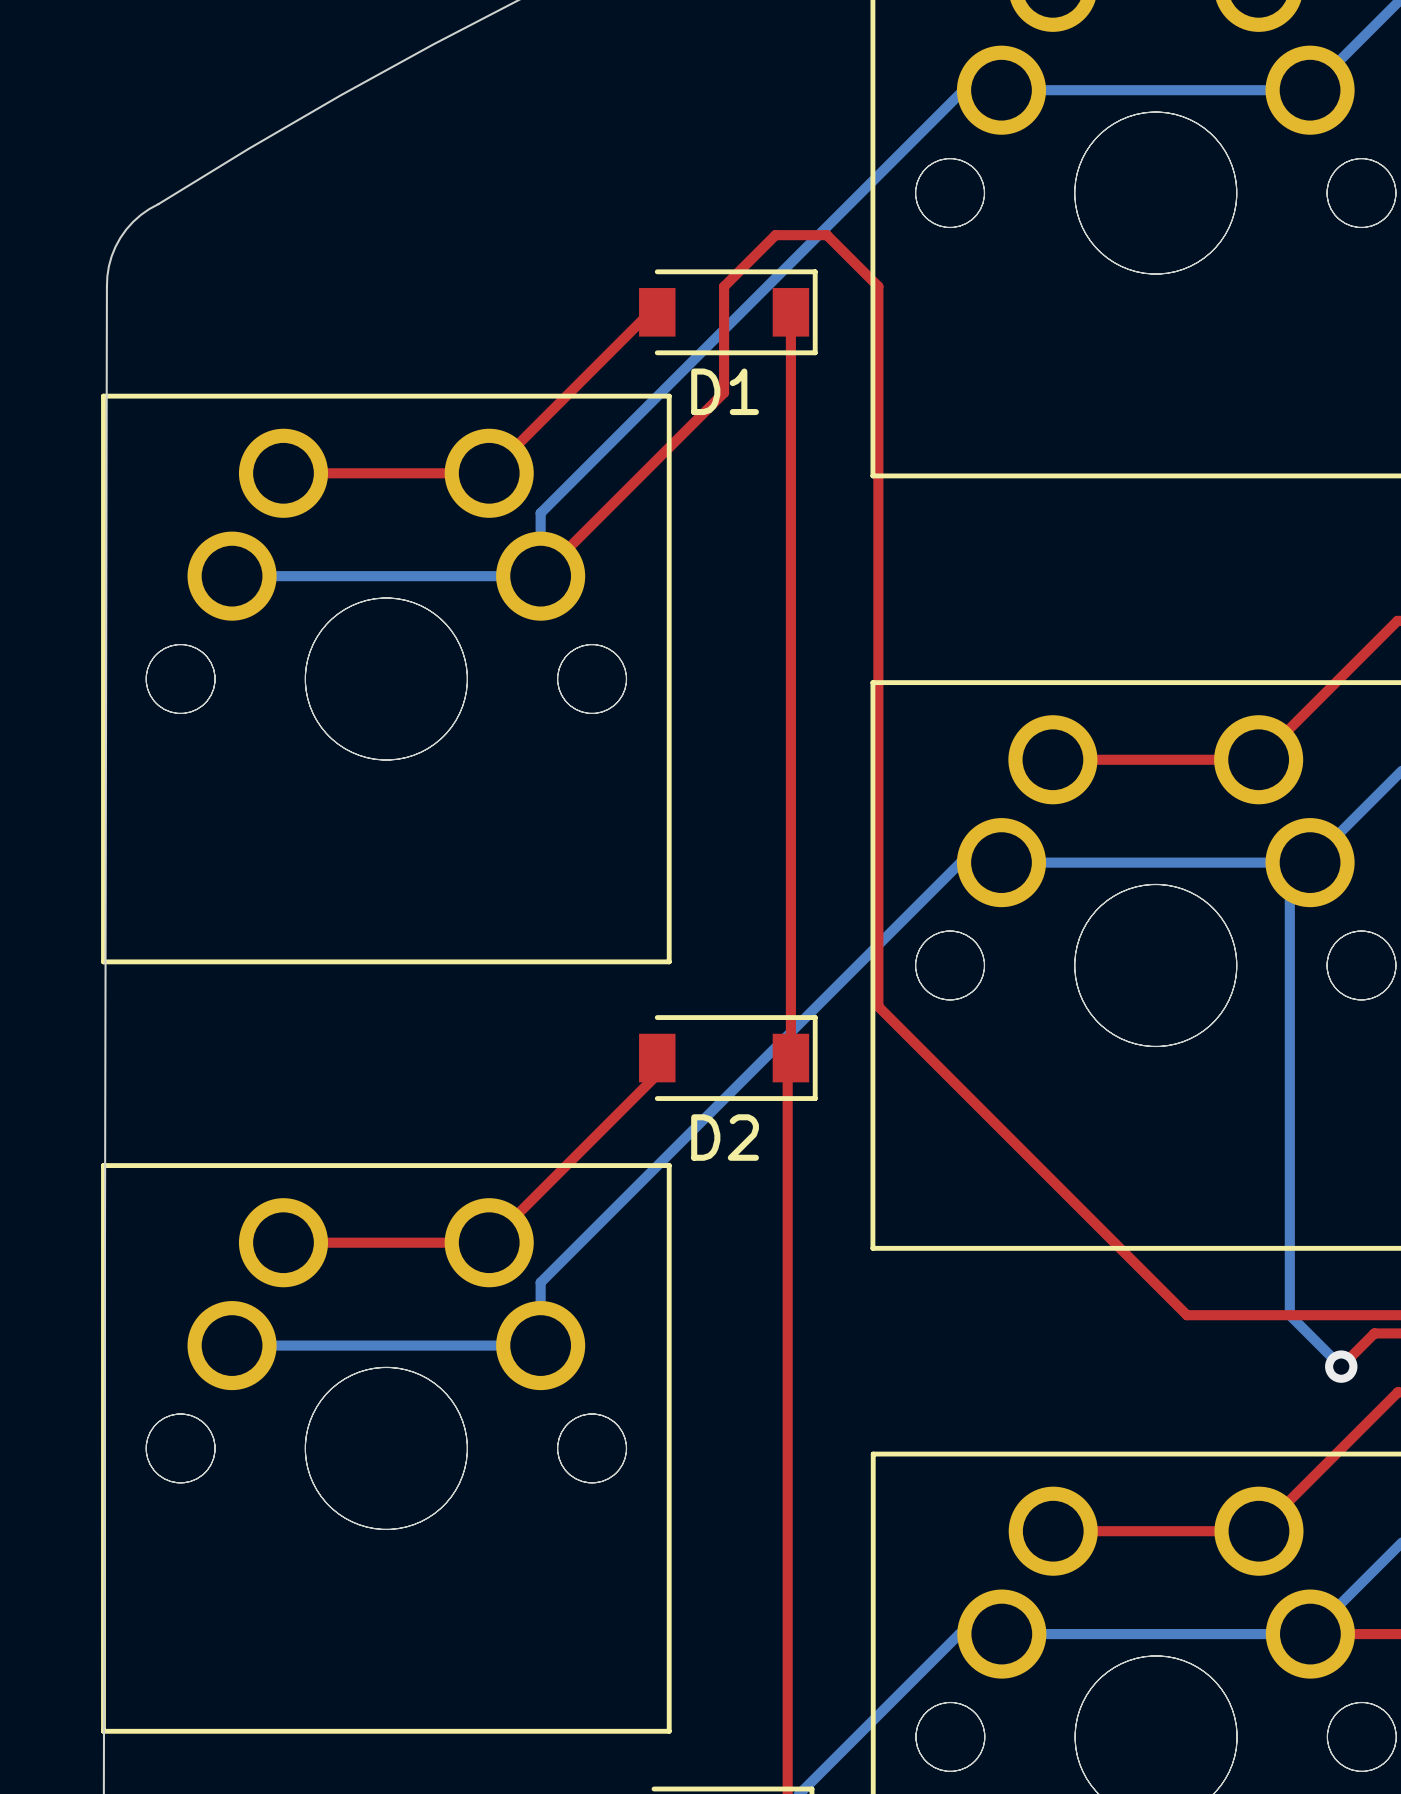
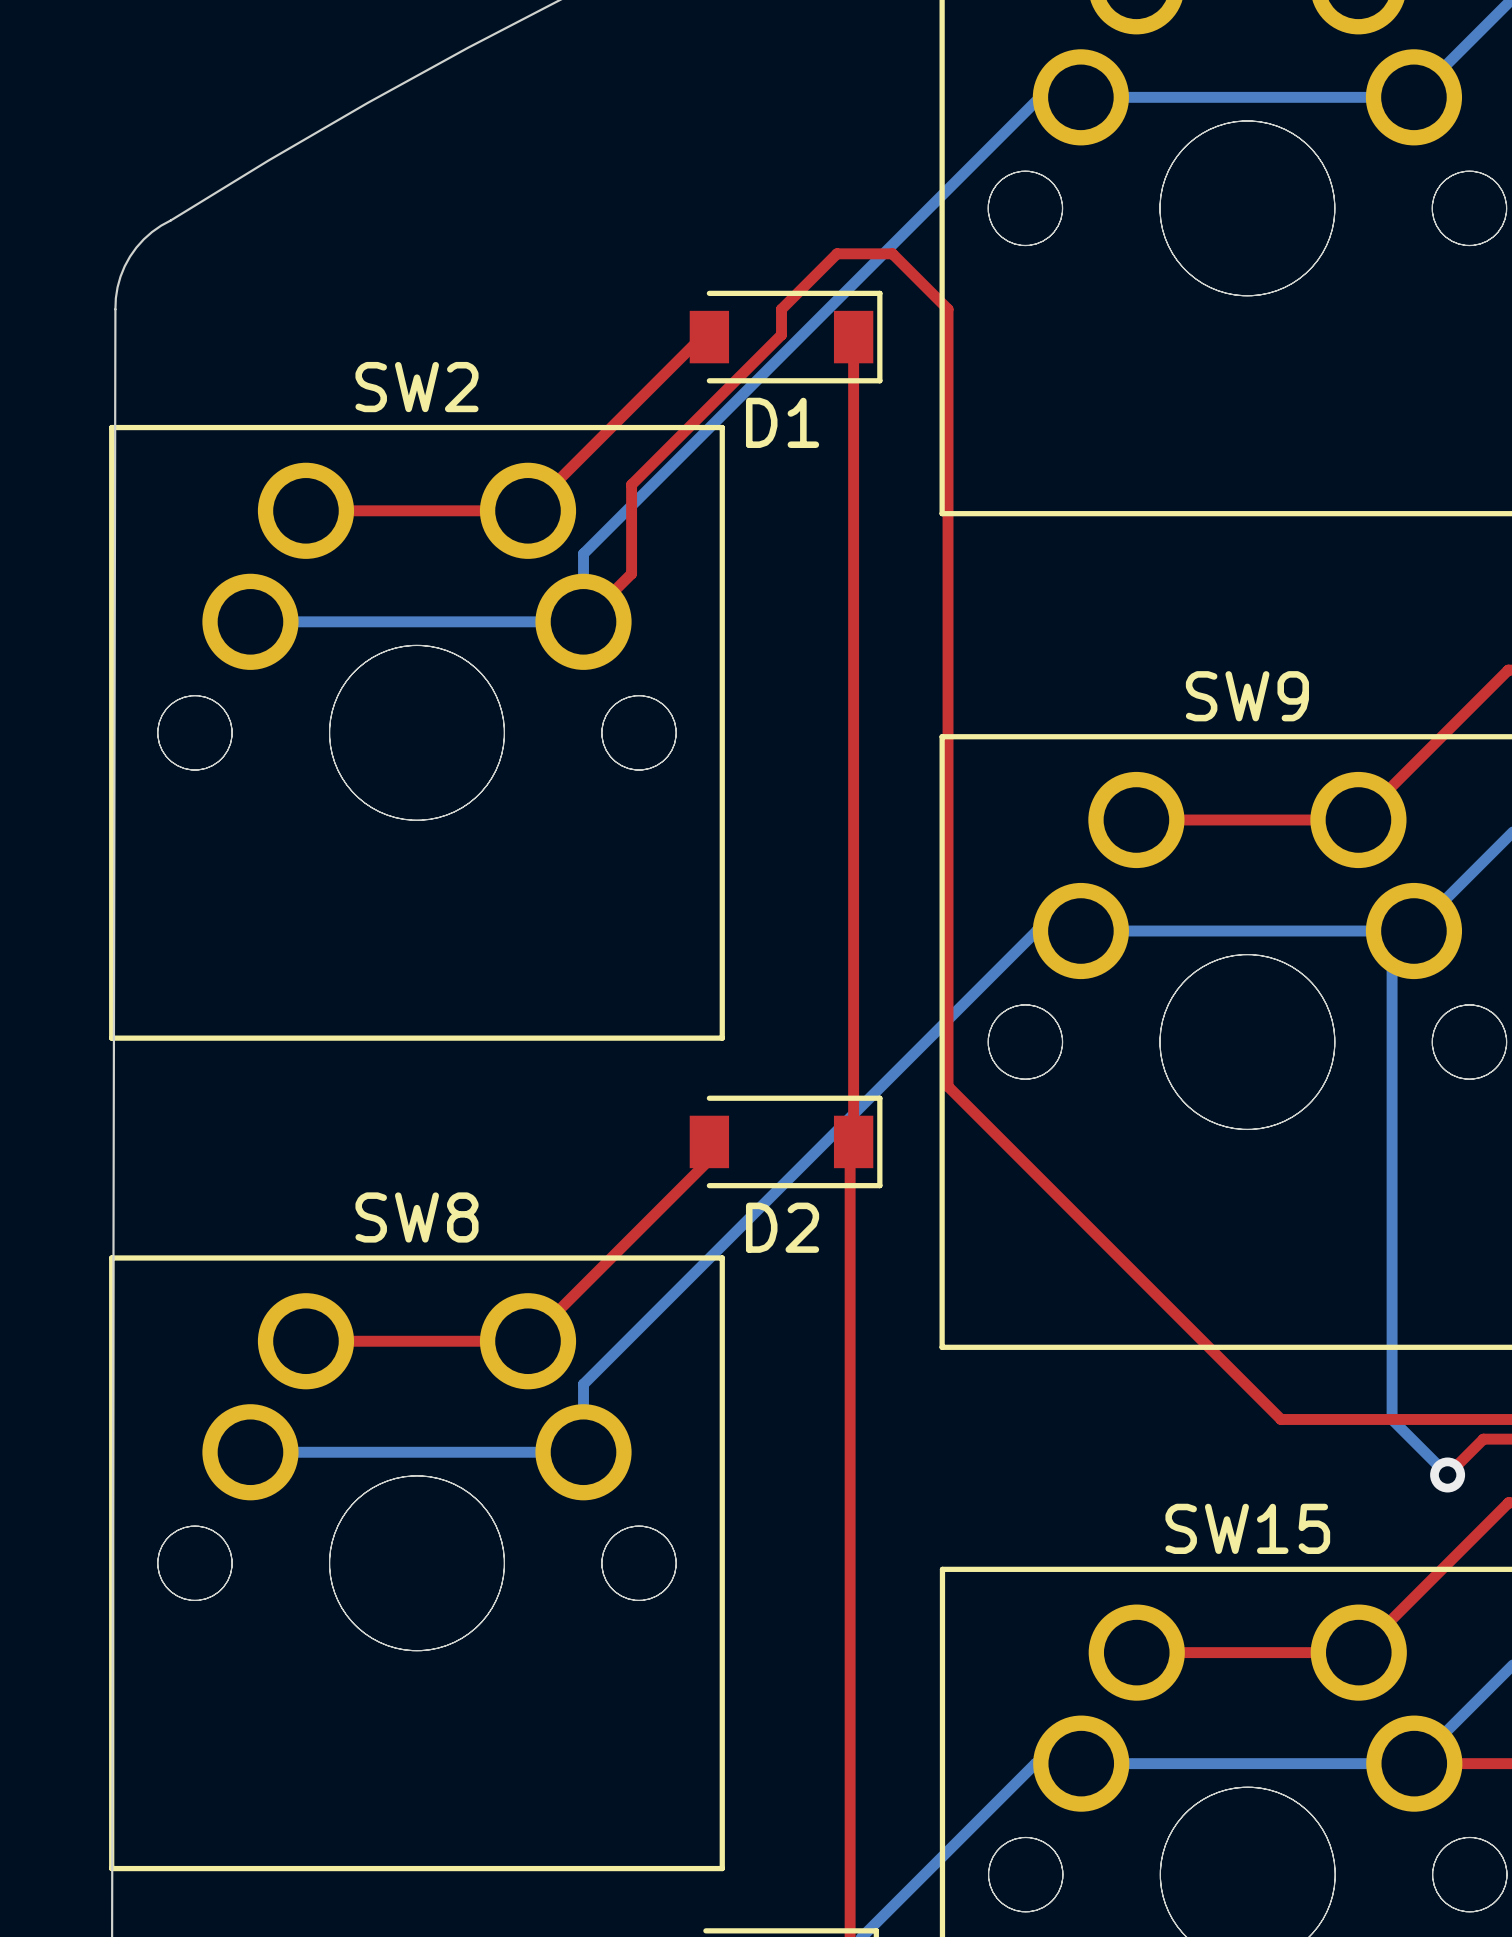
top track: (724, 310) (724, 392) (585, 531) -> (781, 334) (631, 484) (631, 573)
SW2 name: none -> SW2 (416, 387)
SW9 name: none -> SW9 (1247, 696)
SW8 name: none -> SW8 (416, 1217)
SW15 name: none -> SW15 (1247, 1528)

